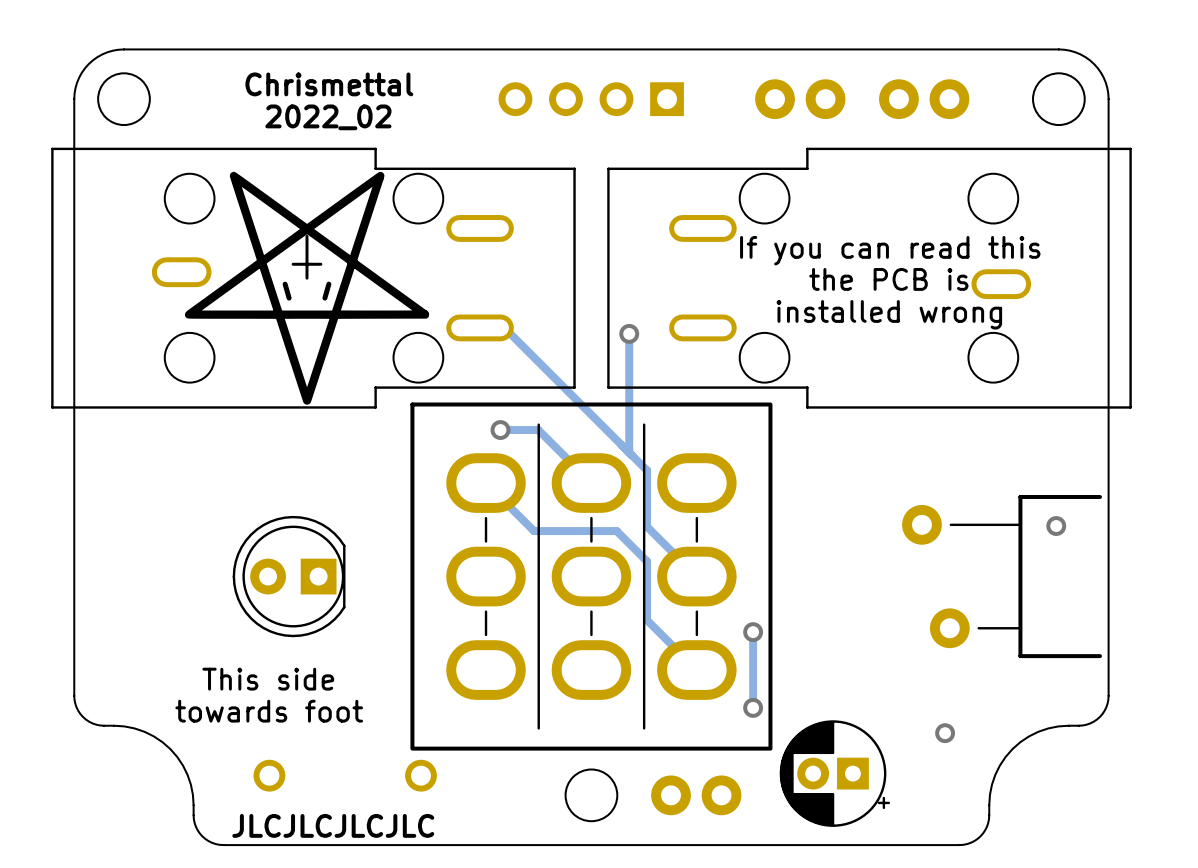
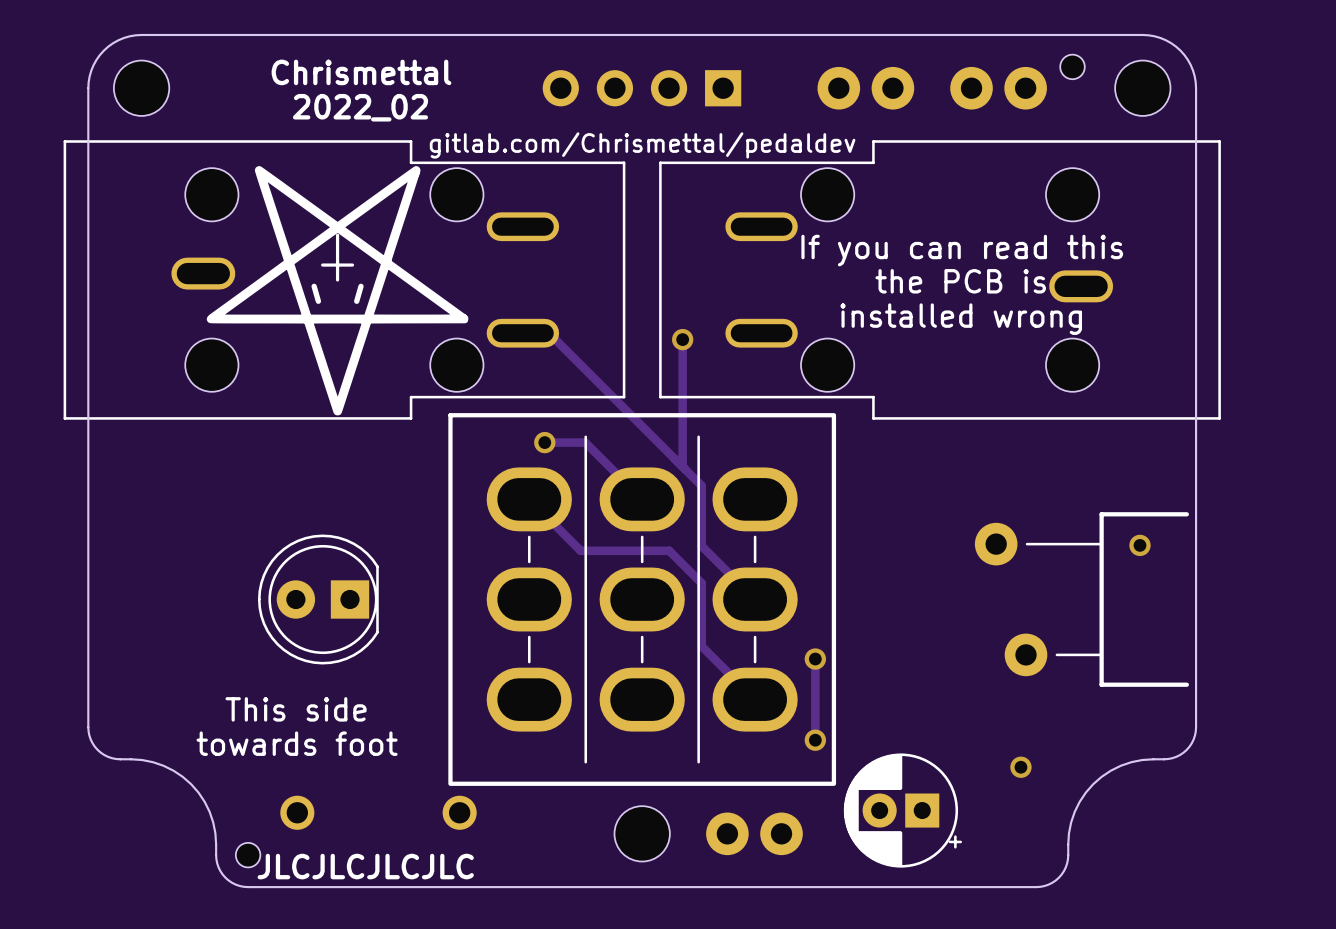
part: none -> (1072, 66)
text: none -> gitlab.com/Chrismettal/pedaldev (642, 145)
part: none -> (248, 855)

